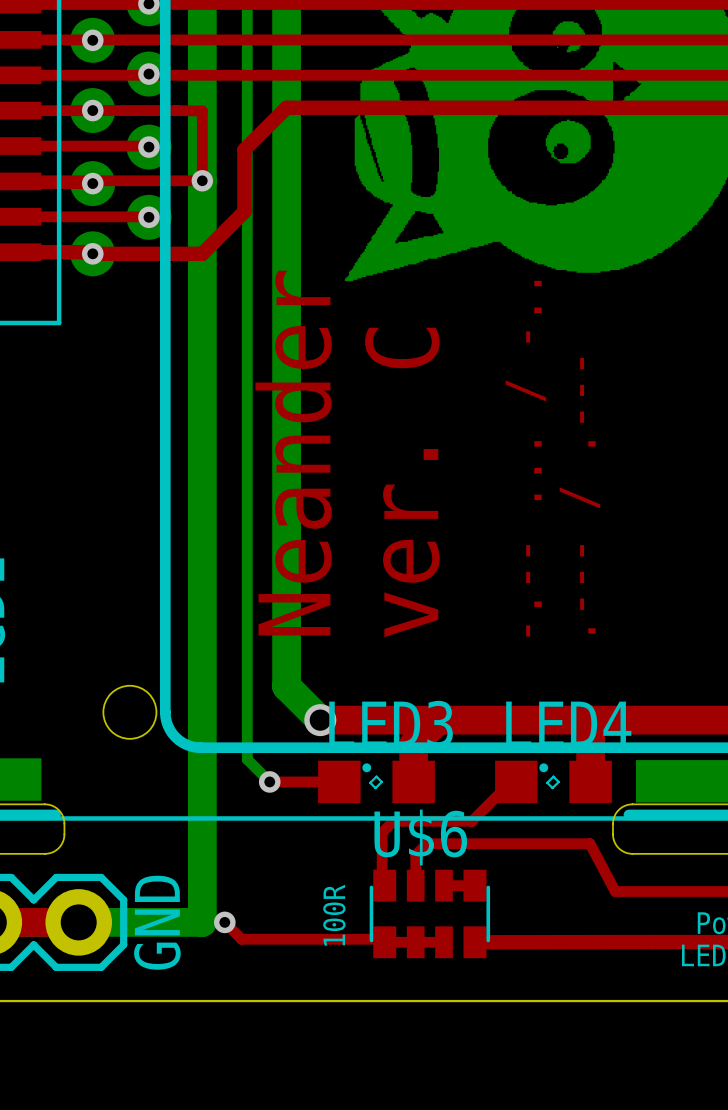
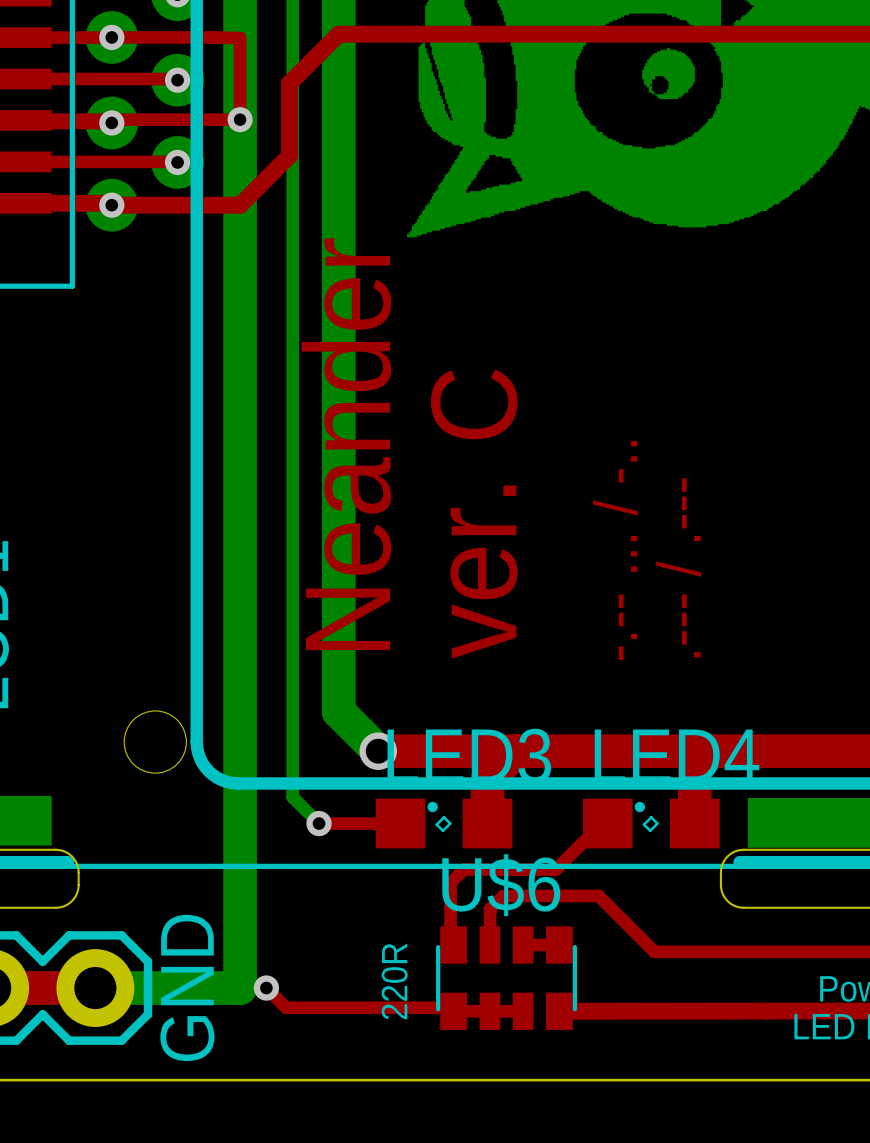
top track: (508, 843) (589, 843) (615, 891) -> (598, 895) (654, 951) (723, 951)
text: 100R (334, 915) -> 220R (394, 981)

